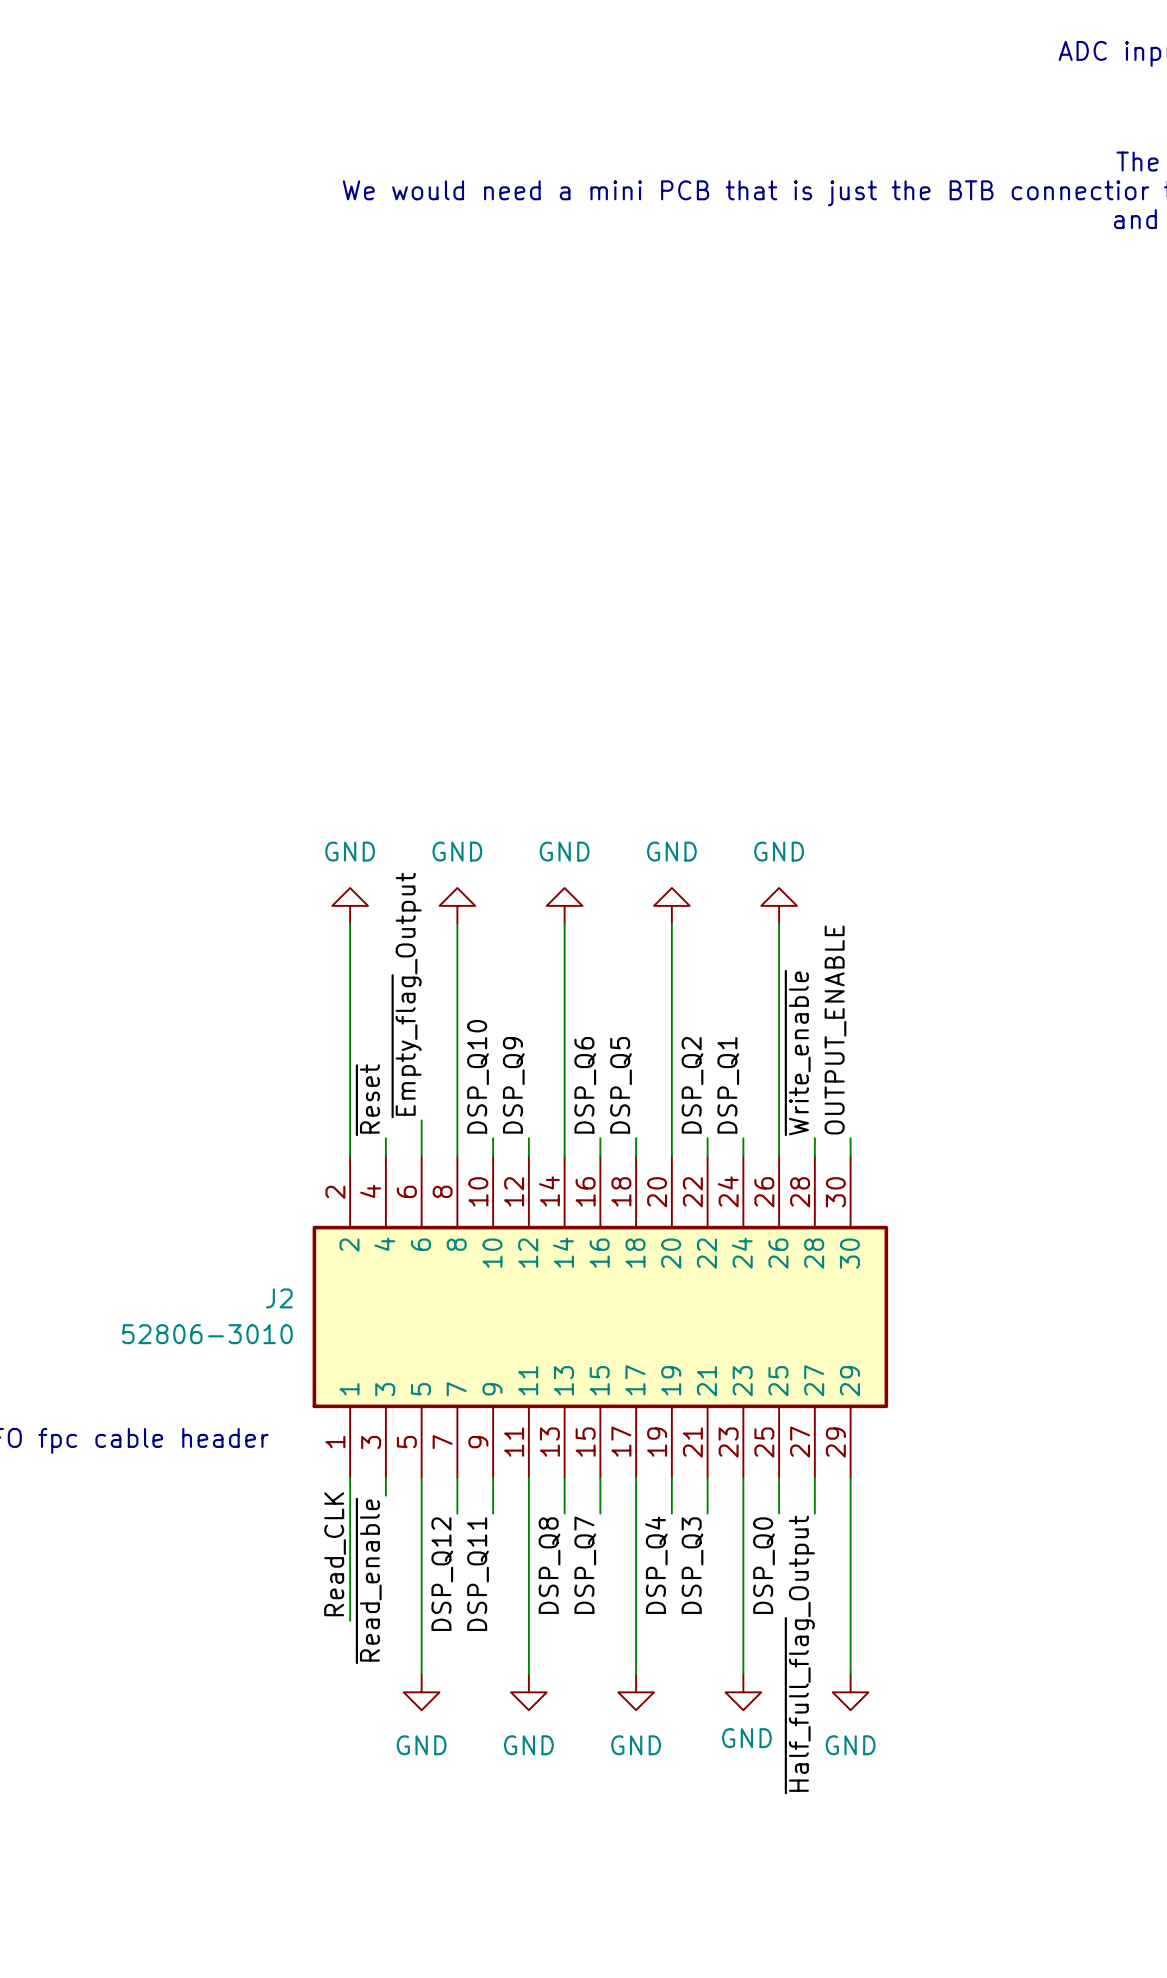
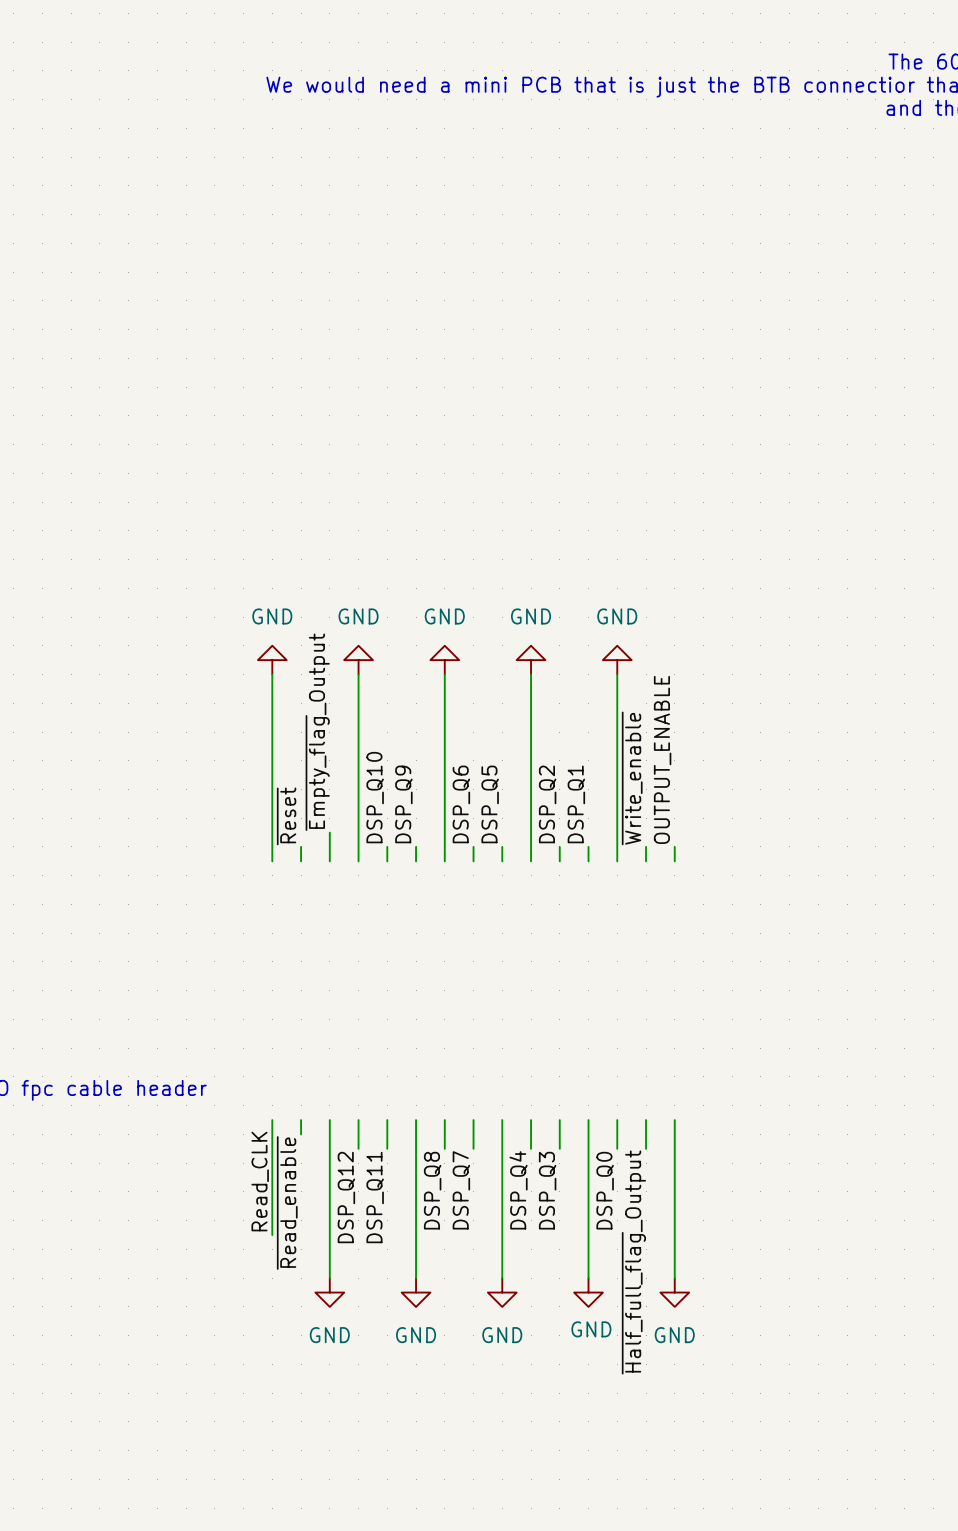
J2: 52806-3010 (600, 1316) -> none

